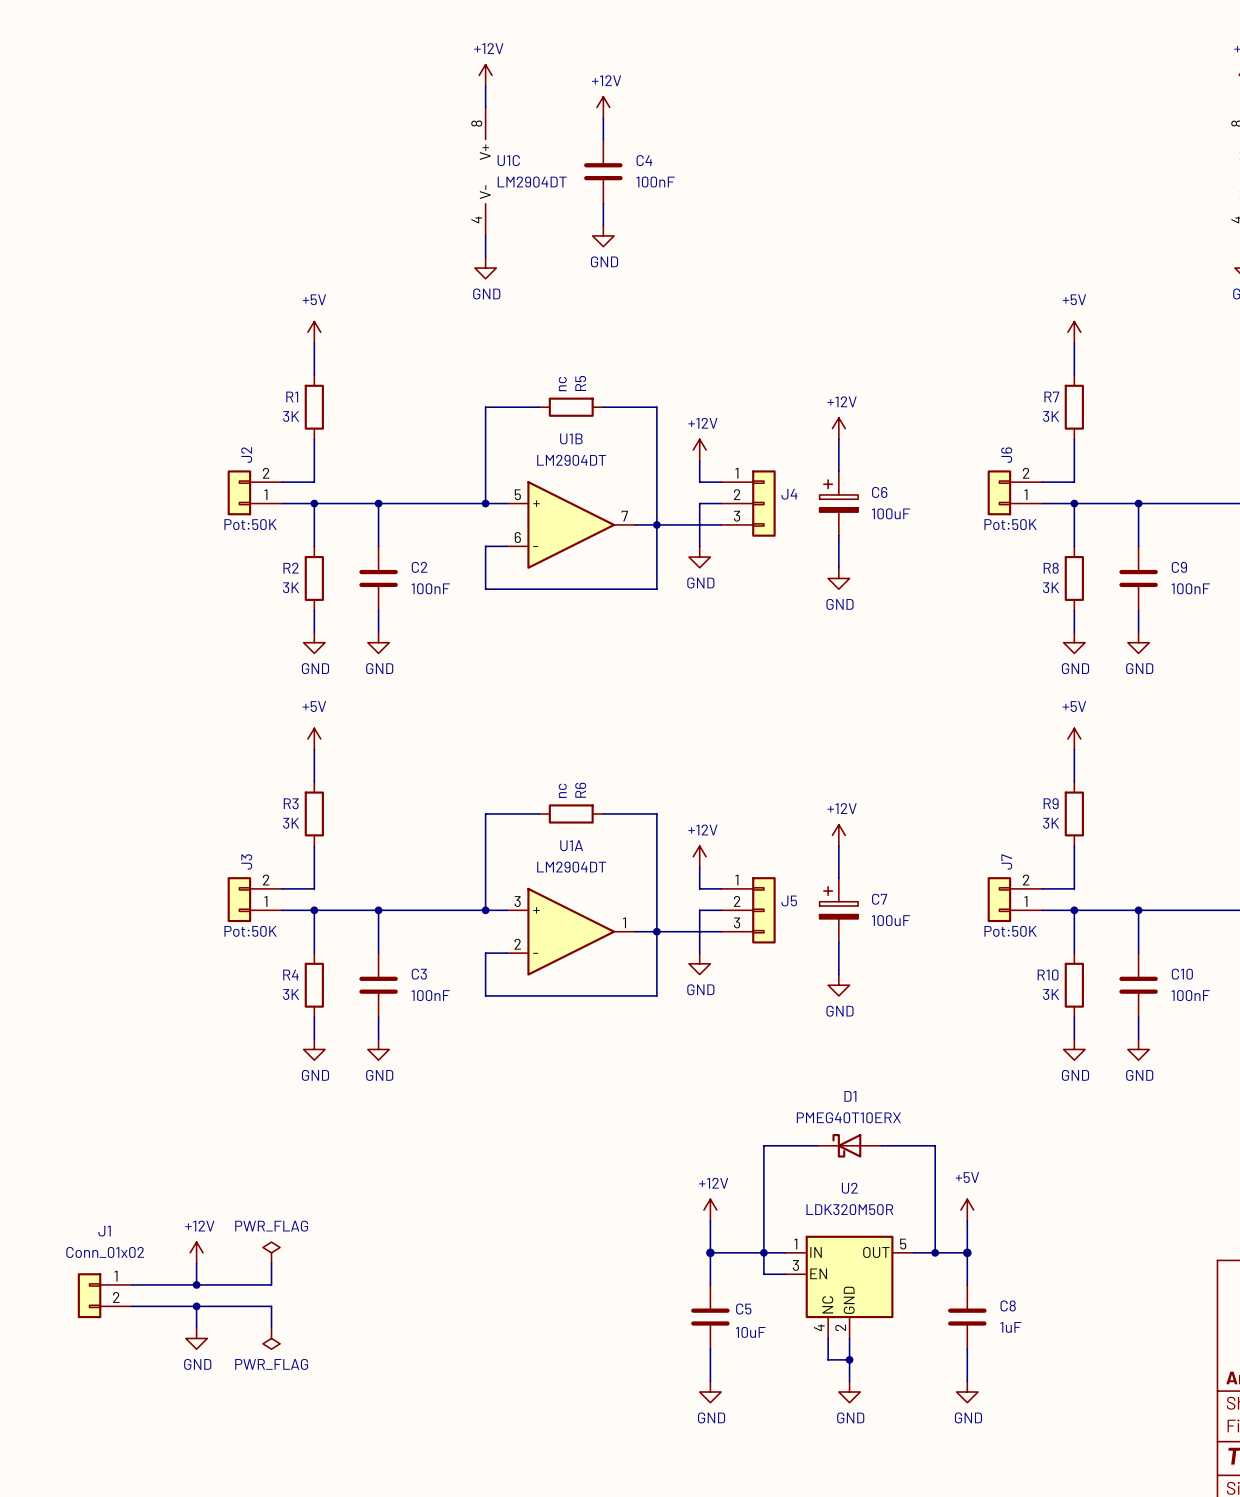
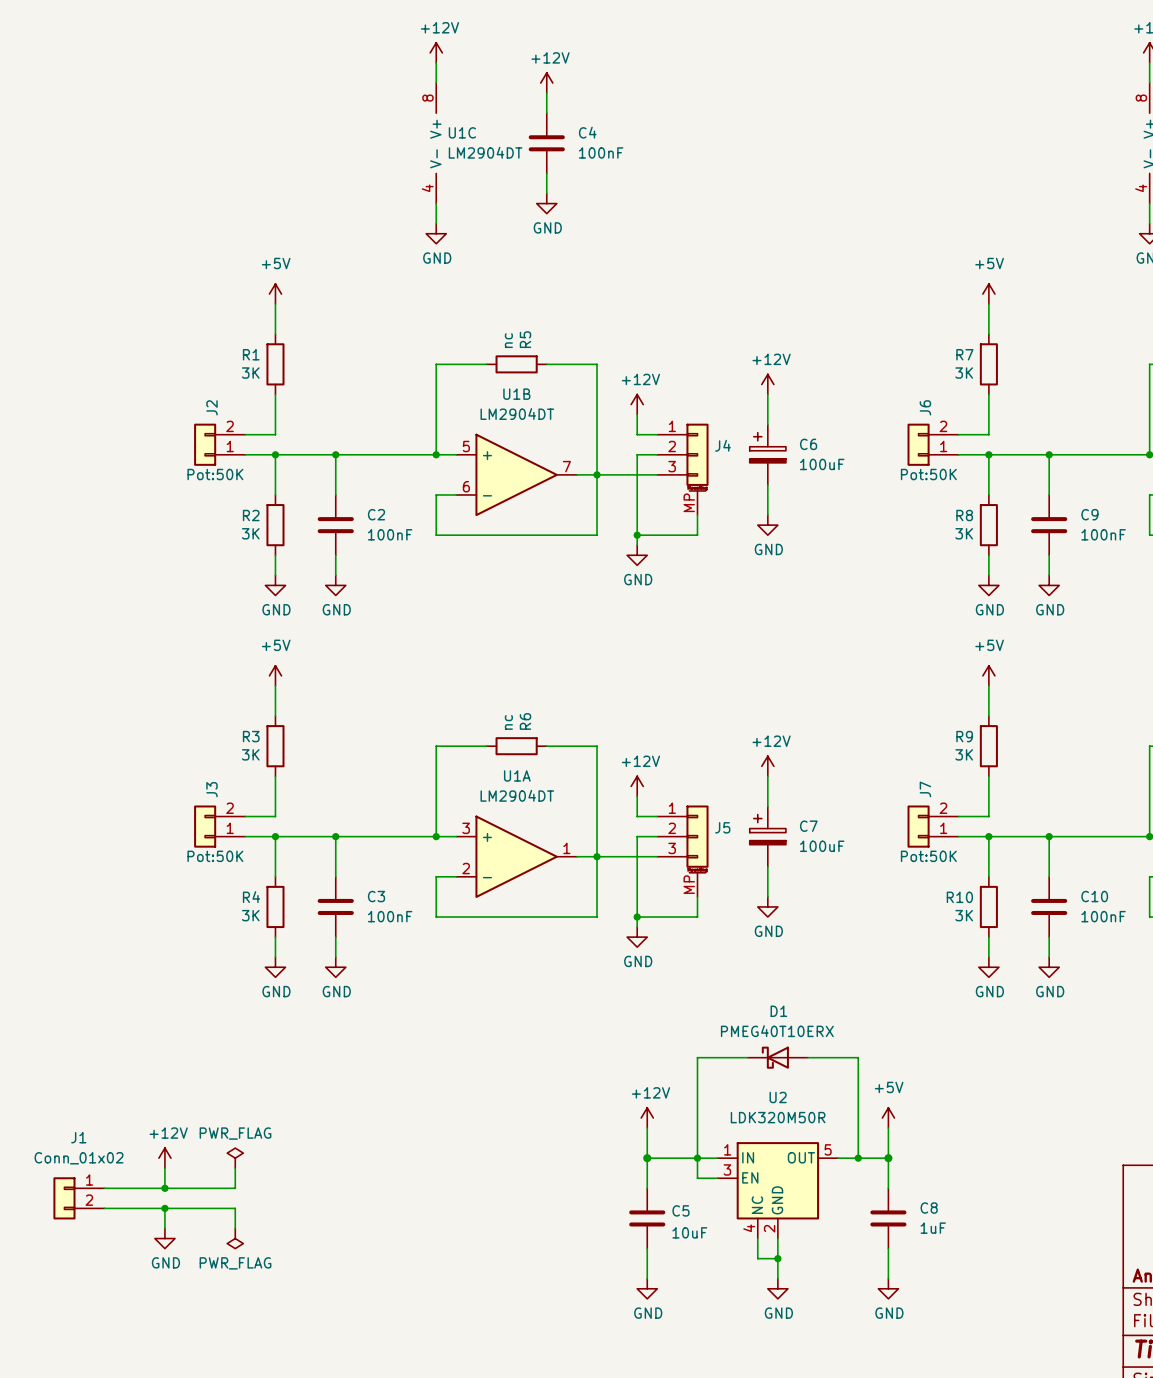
J4 symbol: [721, 470, 776, 537] -> [657, 423, 709, 516]
wire: none -> (637, 494) (637, 545)
power symbol position: GND (699, 557) -> GND (637, 555)
wire: none -> (697, 515) (697, 535) (637, 535)
junction: none -> (637, 535)
J5 symbol: [721, 877, 776, 944] -> [657, 805, 709, 897]
wire: none -> (637, 876) (637, 927)
power symbol position: GND (699, 963) -> GND (637, 937)
wire: none -> (697, 896) (697, 917) (637, 917)
junction: none -> (637, 917)

